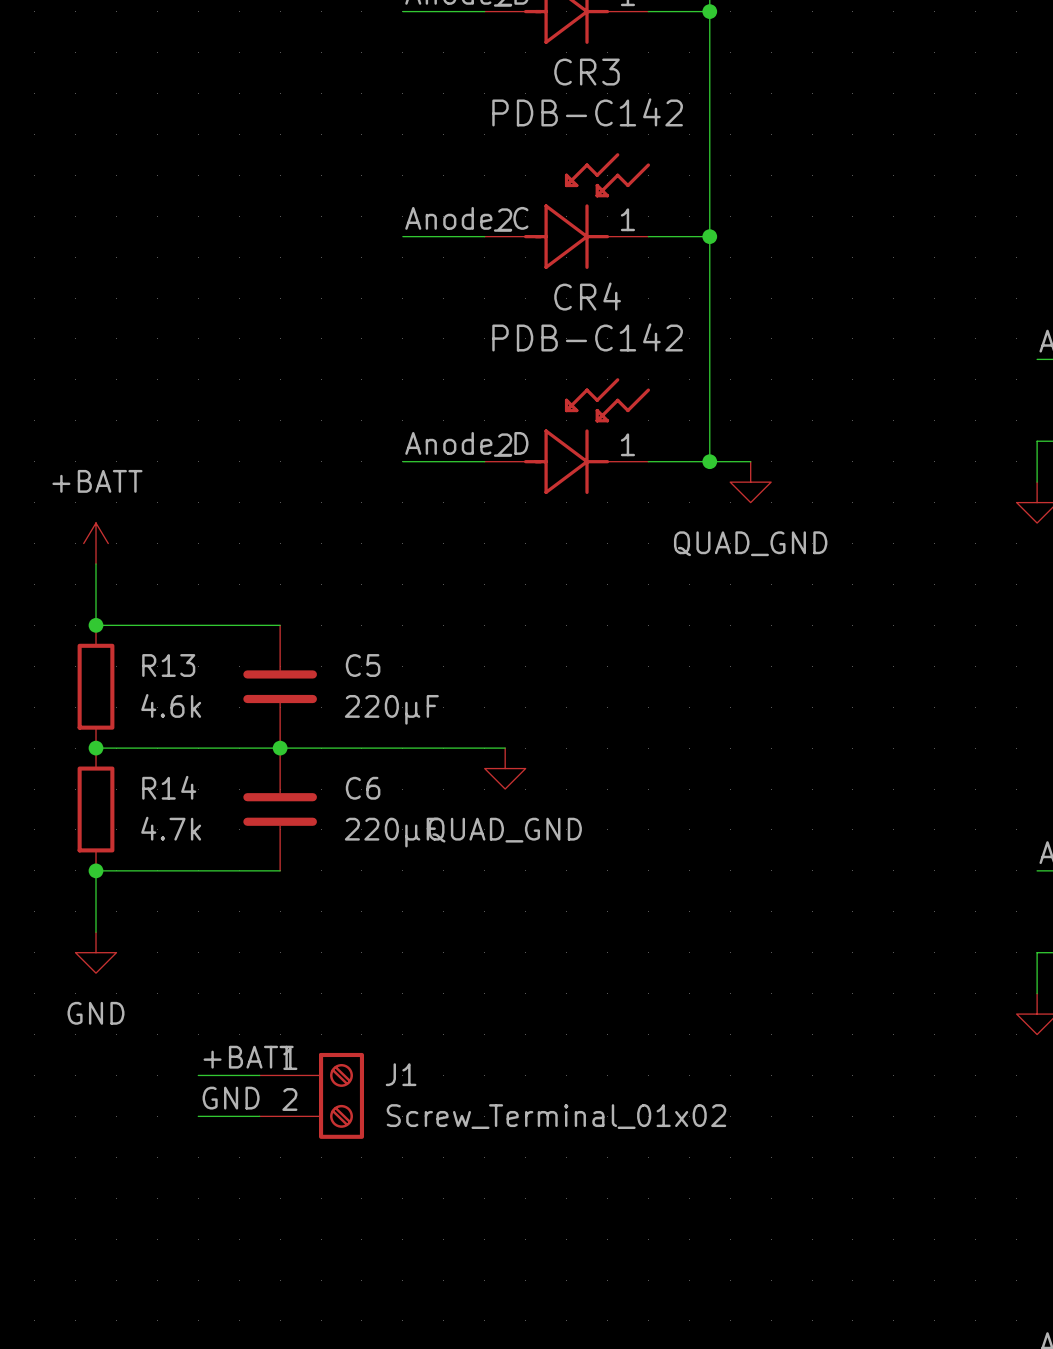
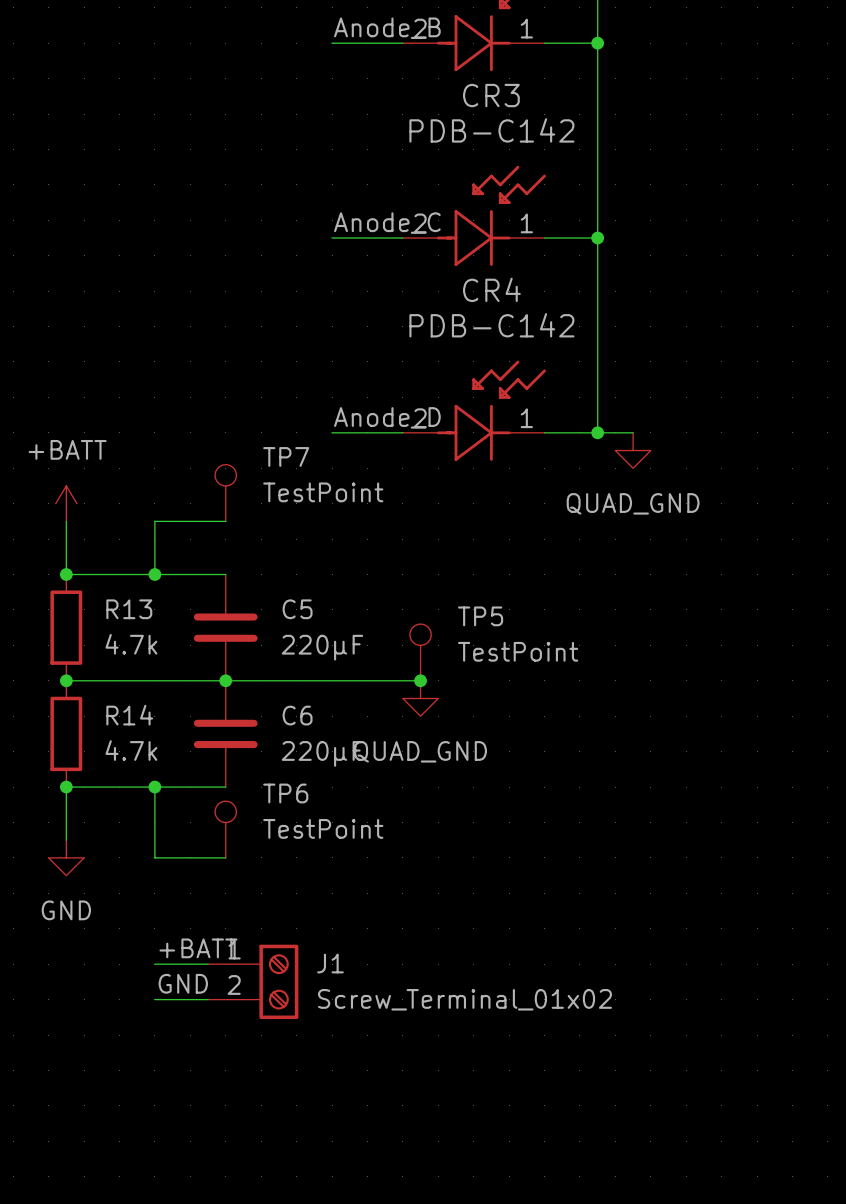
TP7: none -> TestPoint (225, 493)
wire: none -> (225, 521) (154, 521) (154, 574)
junction: none -> (154, 574)
R13 value: 4.6k (171, 705) -> 4.7k (131, 644)
TP5: none -> TestPoint (420, 652)
junction: none -> (420, 680)
wire: none -> (154, 787) (154, 857) (225, 857)
junction: none -> (154, 787)
TP6: none -> TestPoint (225, 829)

